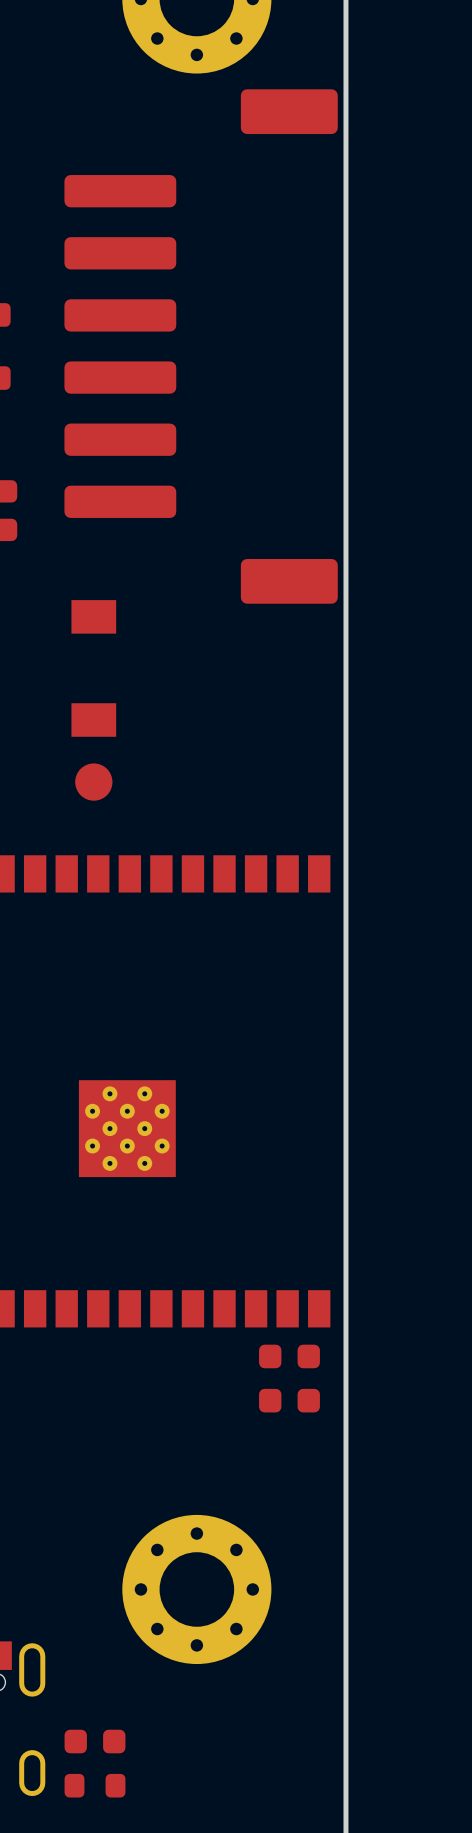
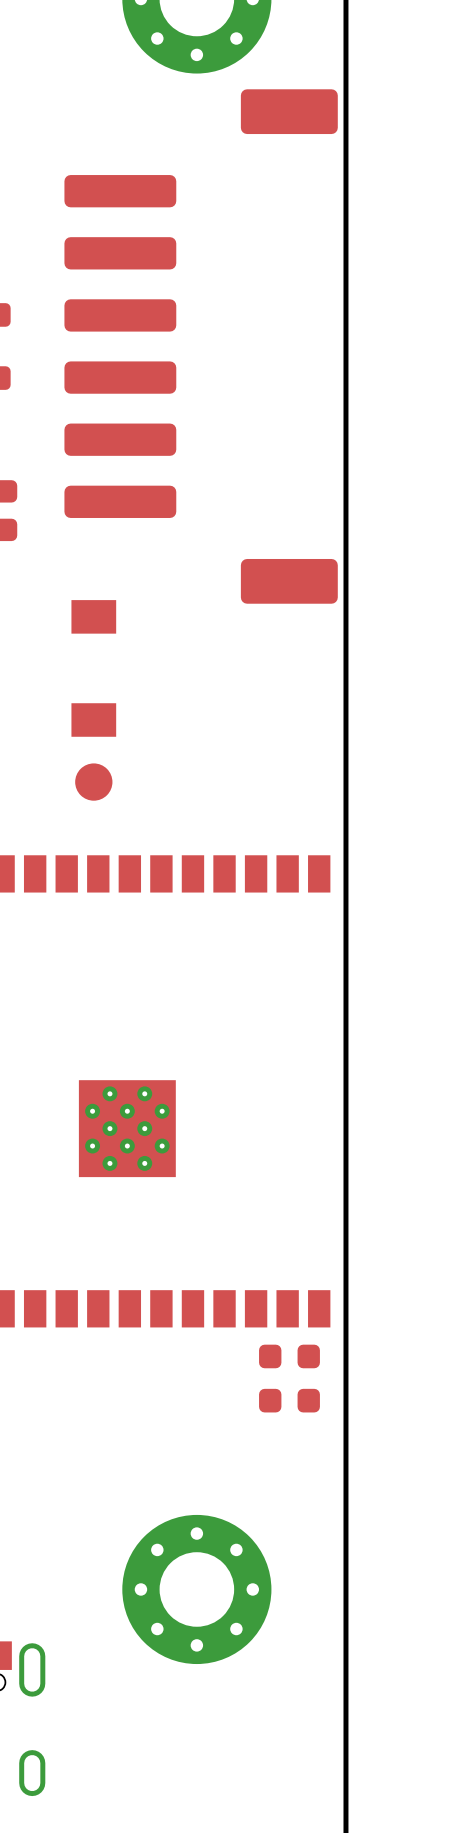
part: (95, 1741) -> none
part: (95, 1785) -> none

